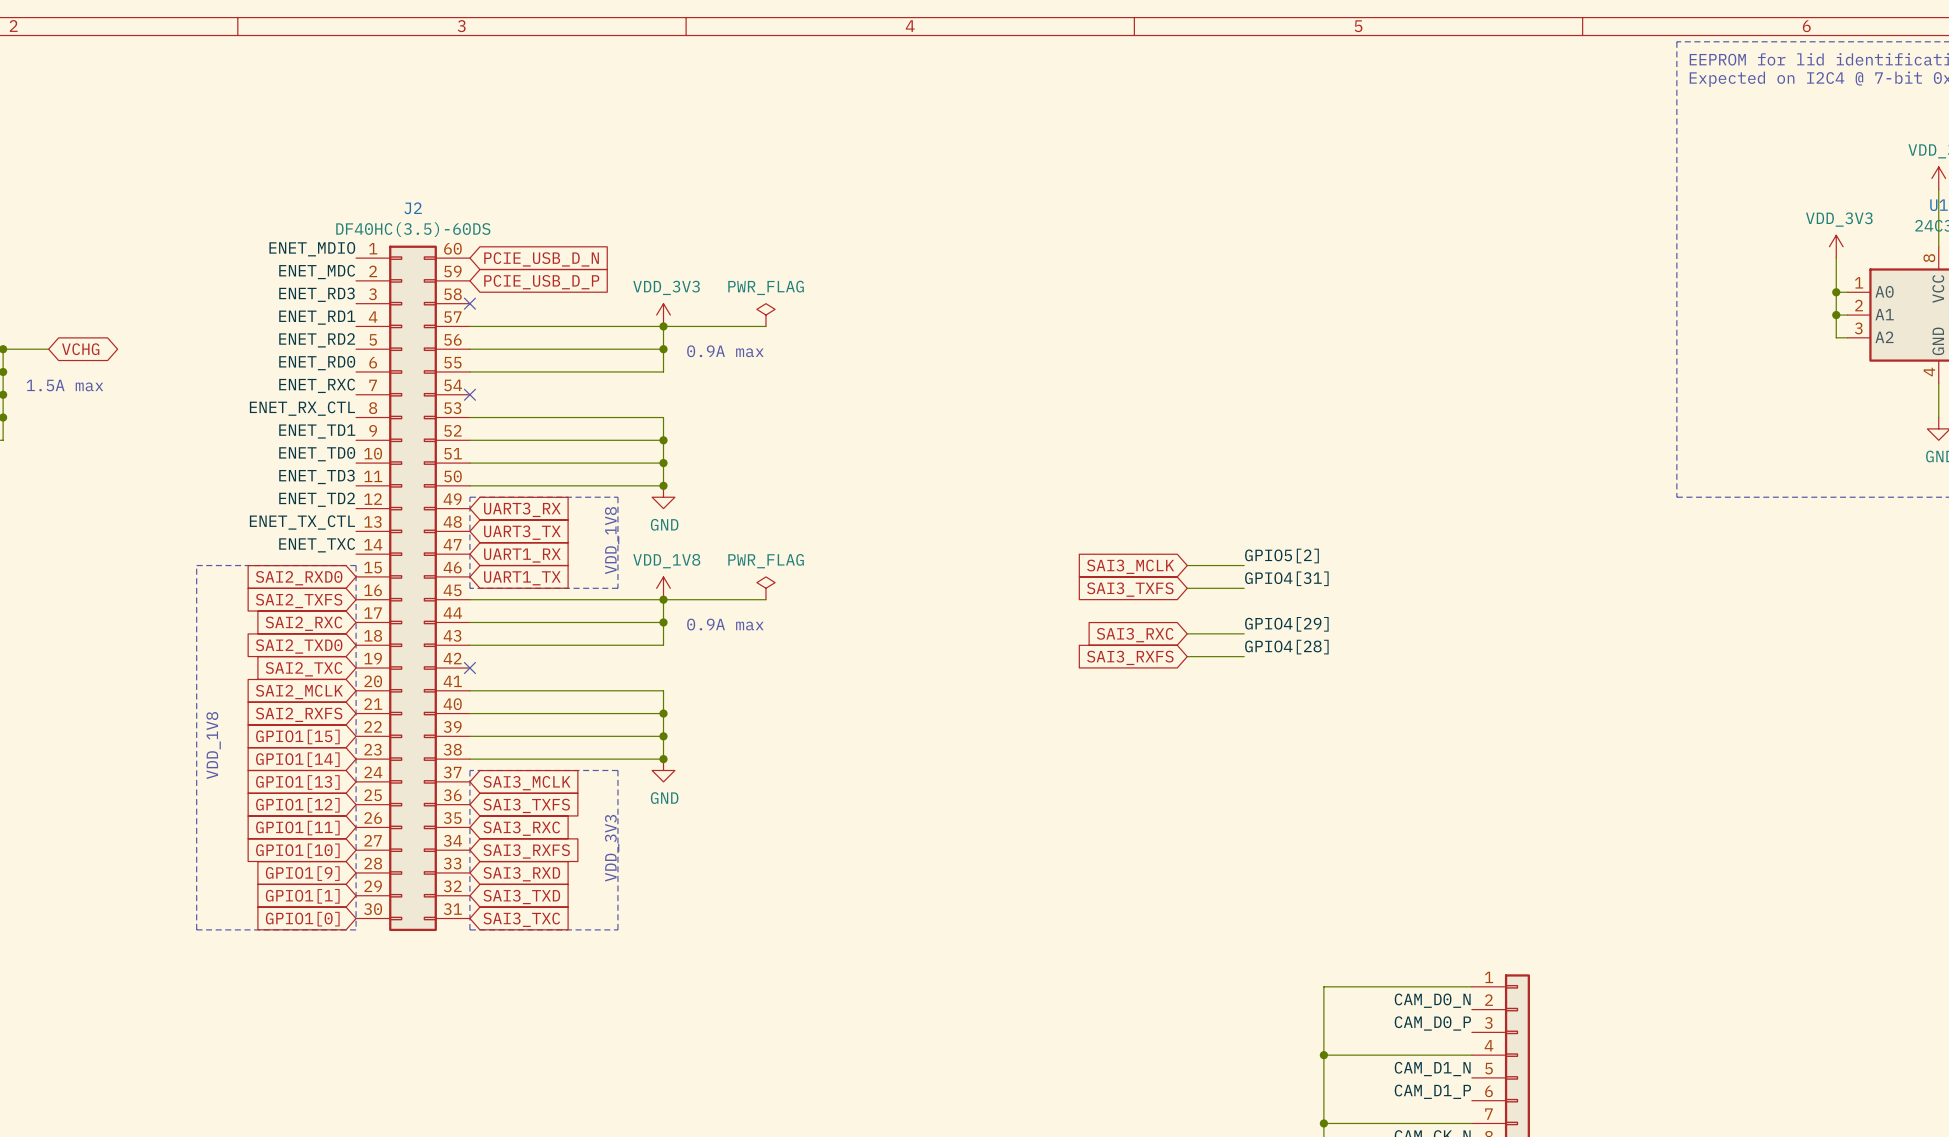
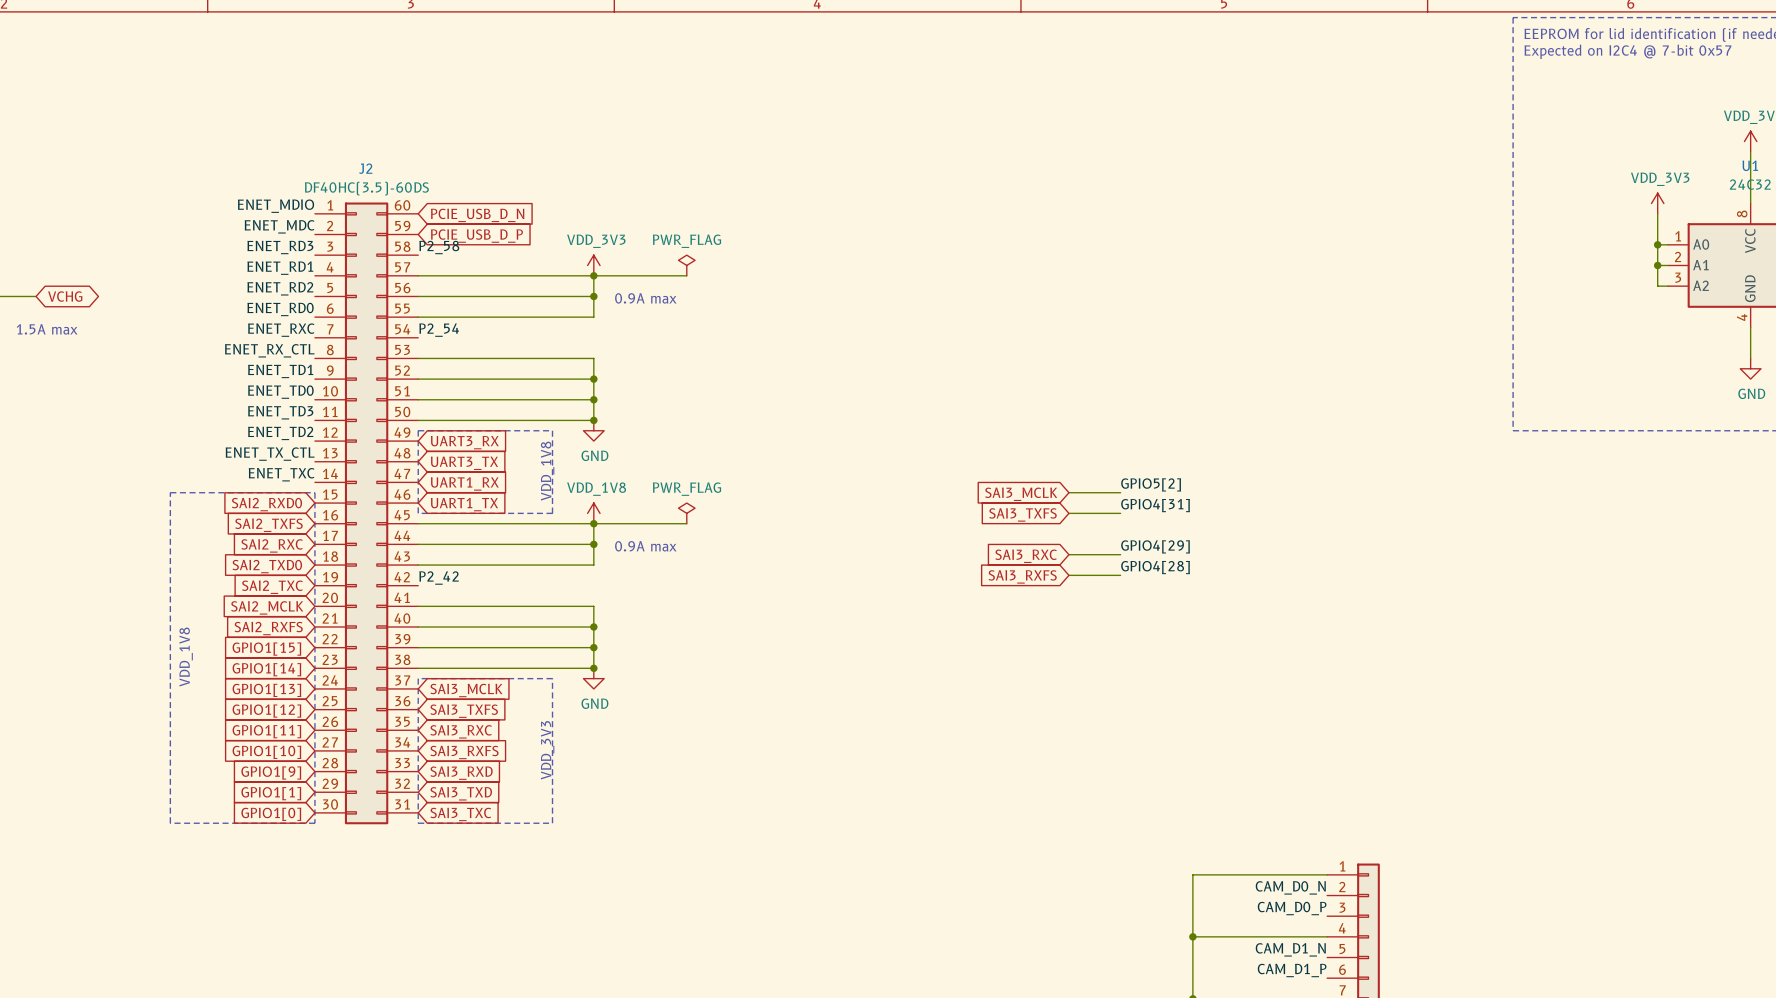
label: none -> P2_58 (439, 247)
no-connect mark: (469, 303) -> none
label: none -> P2_54 (439, 330)
no-connect mark: (469, 394) -> none
label: none -> P2_42 (439, 578)
no-connect mark: (469, 668) -> none

